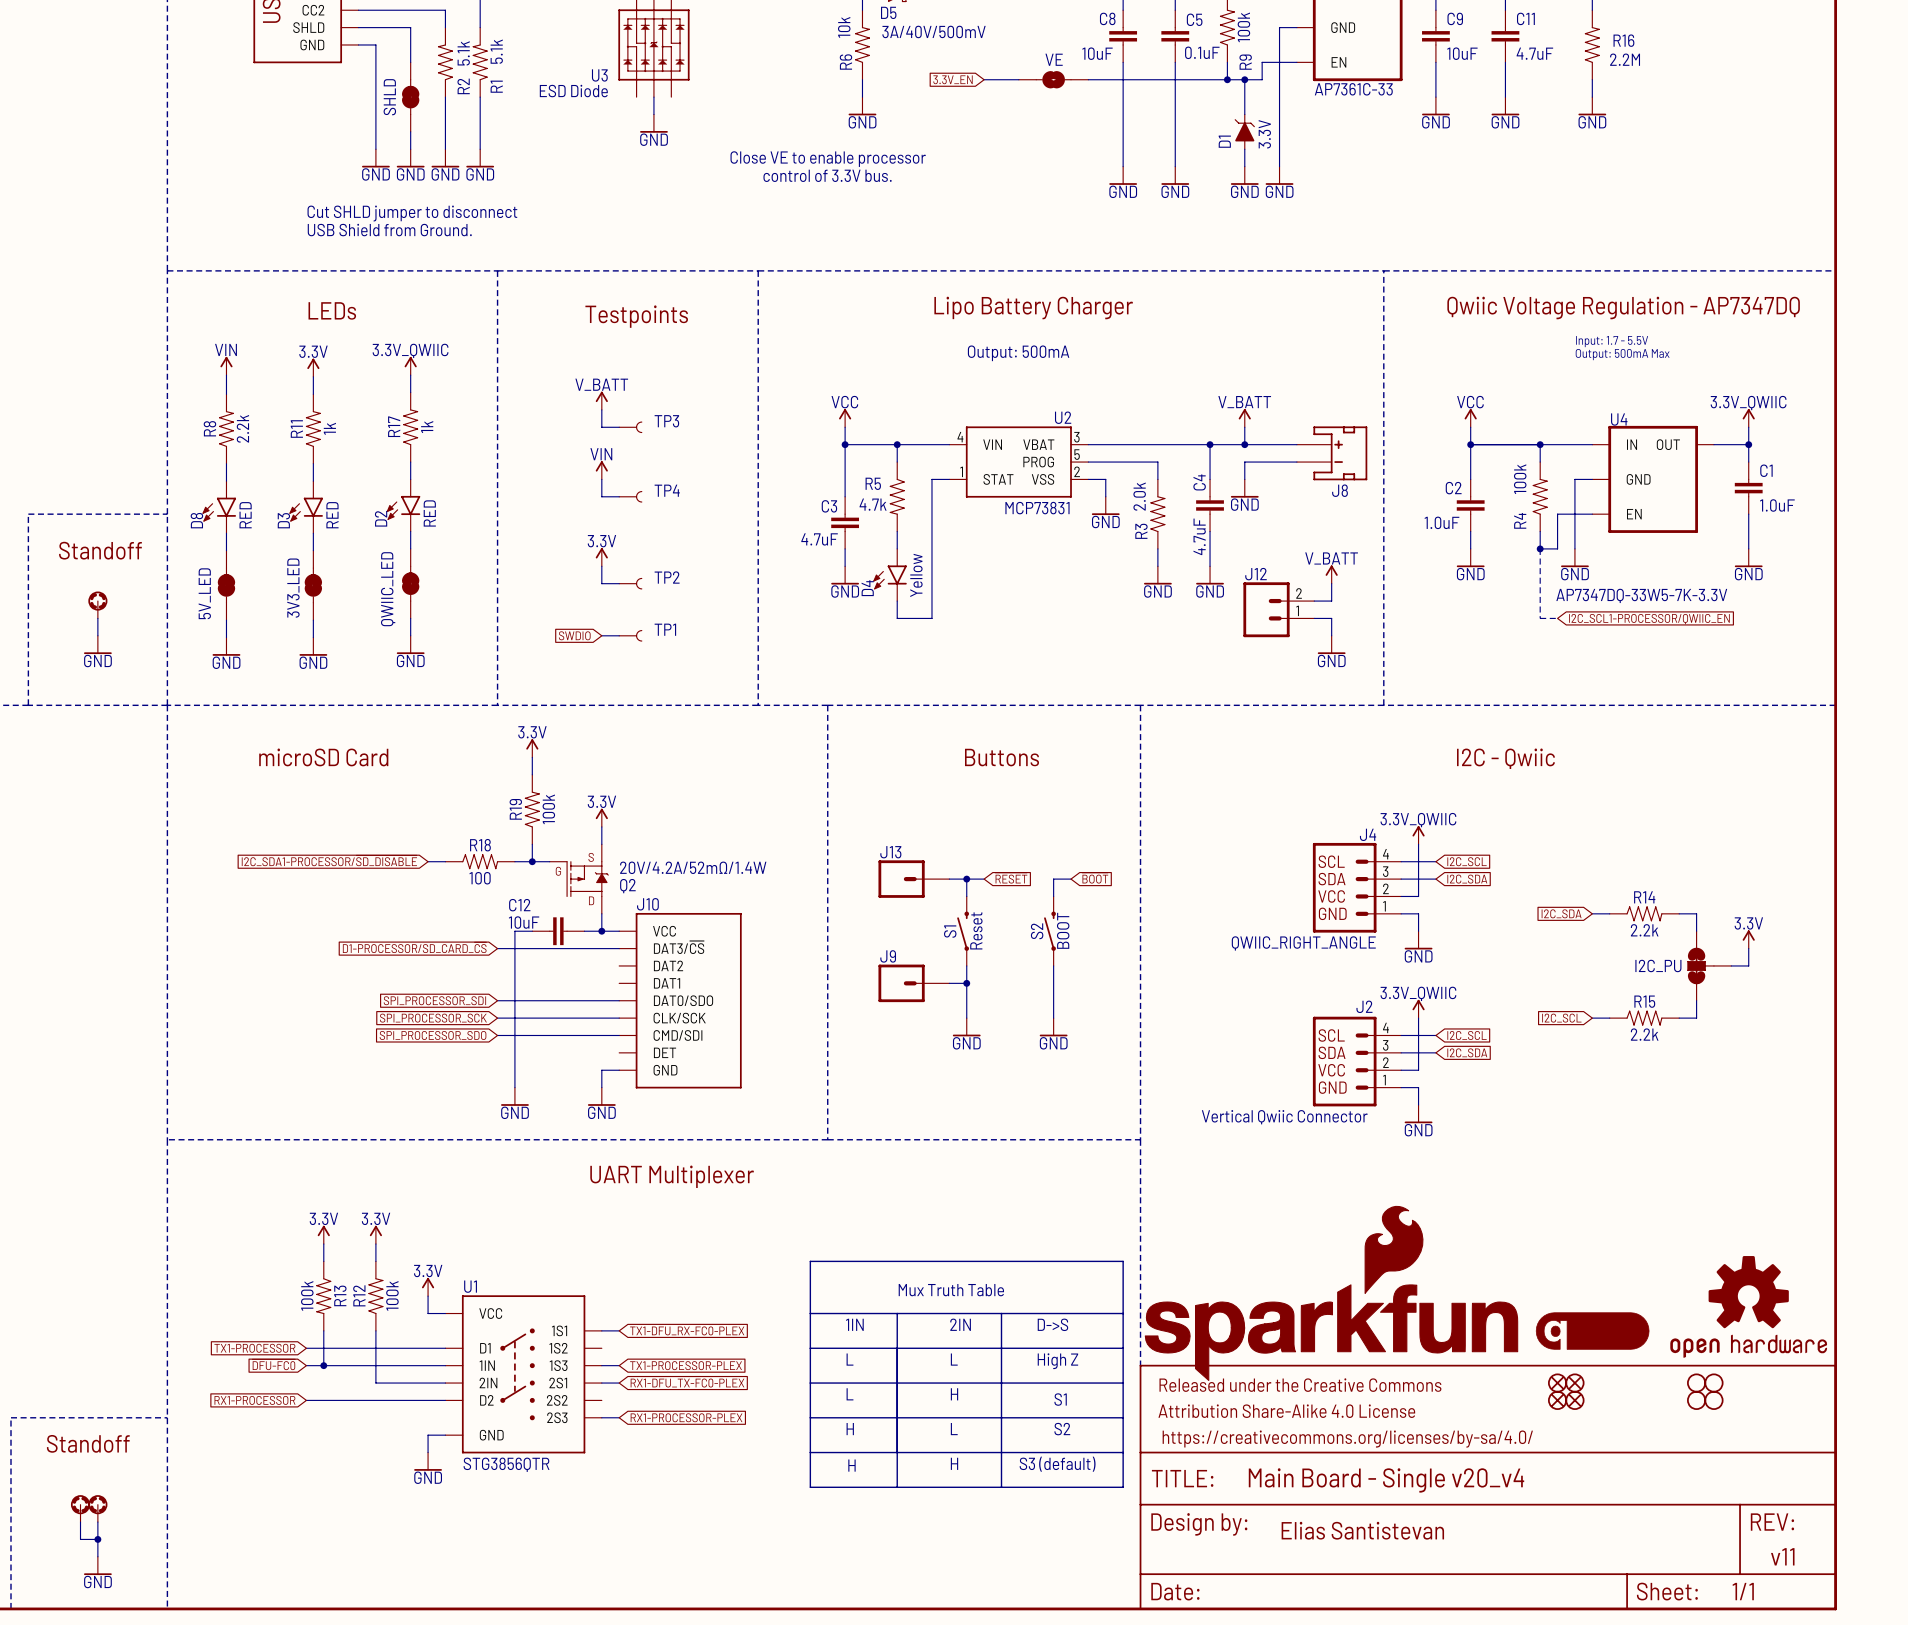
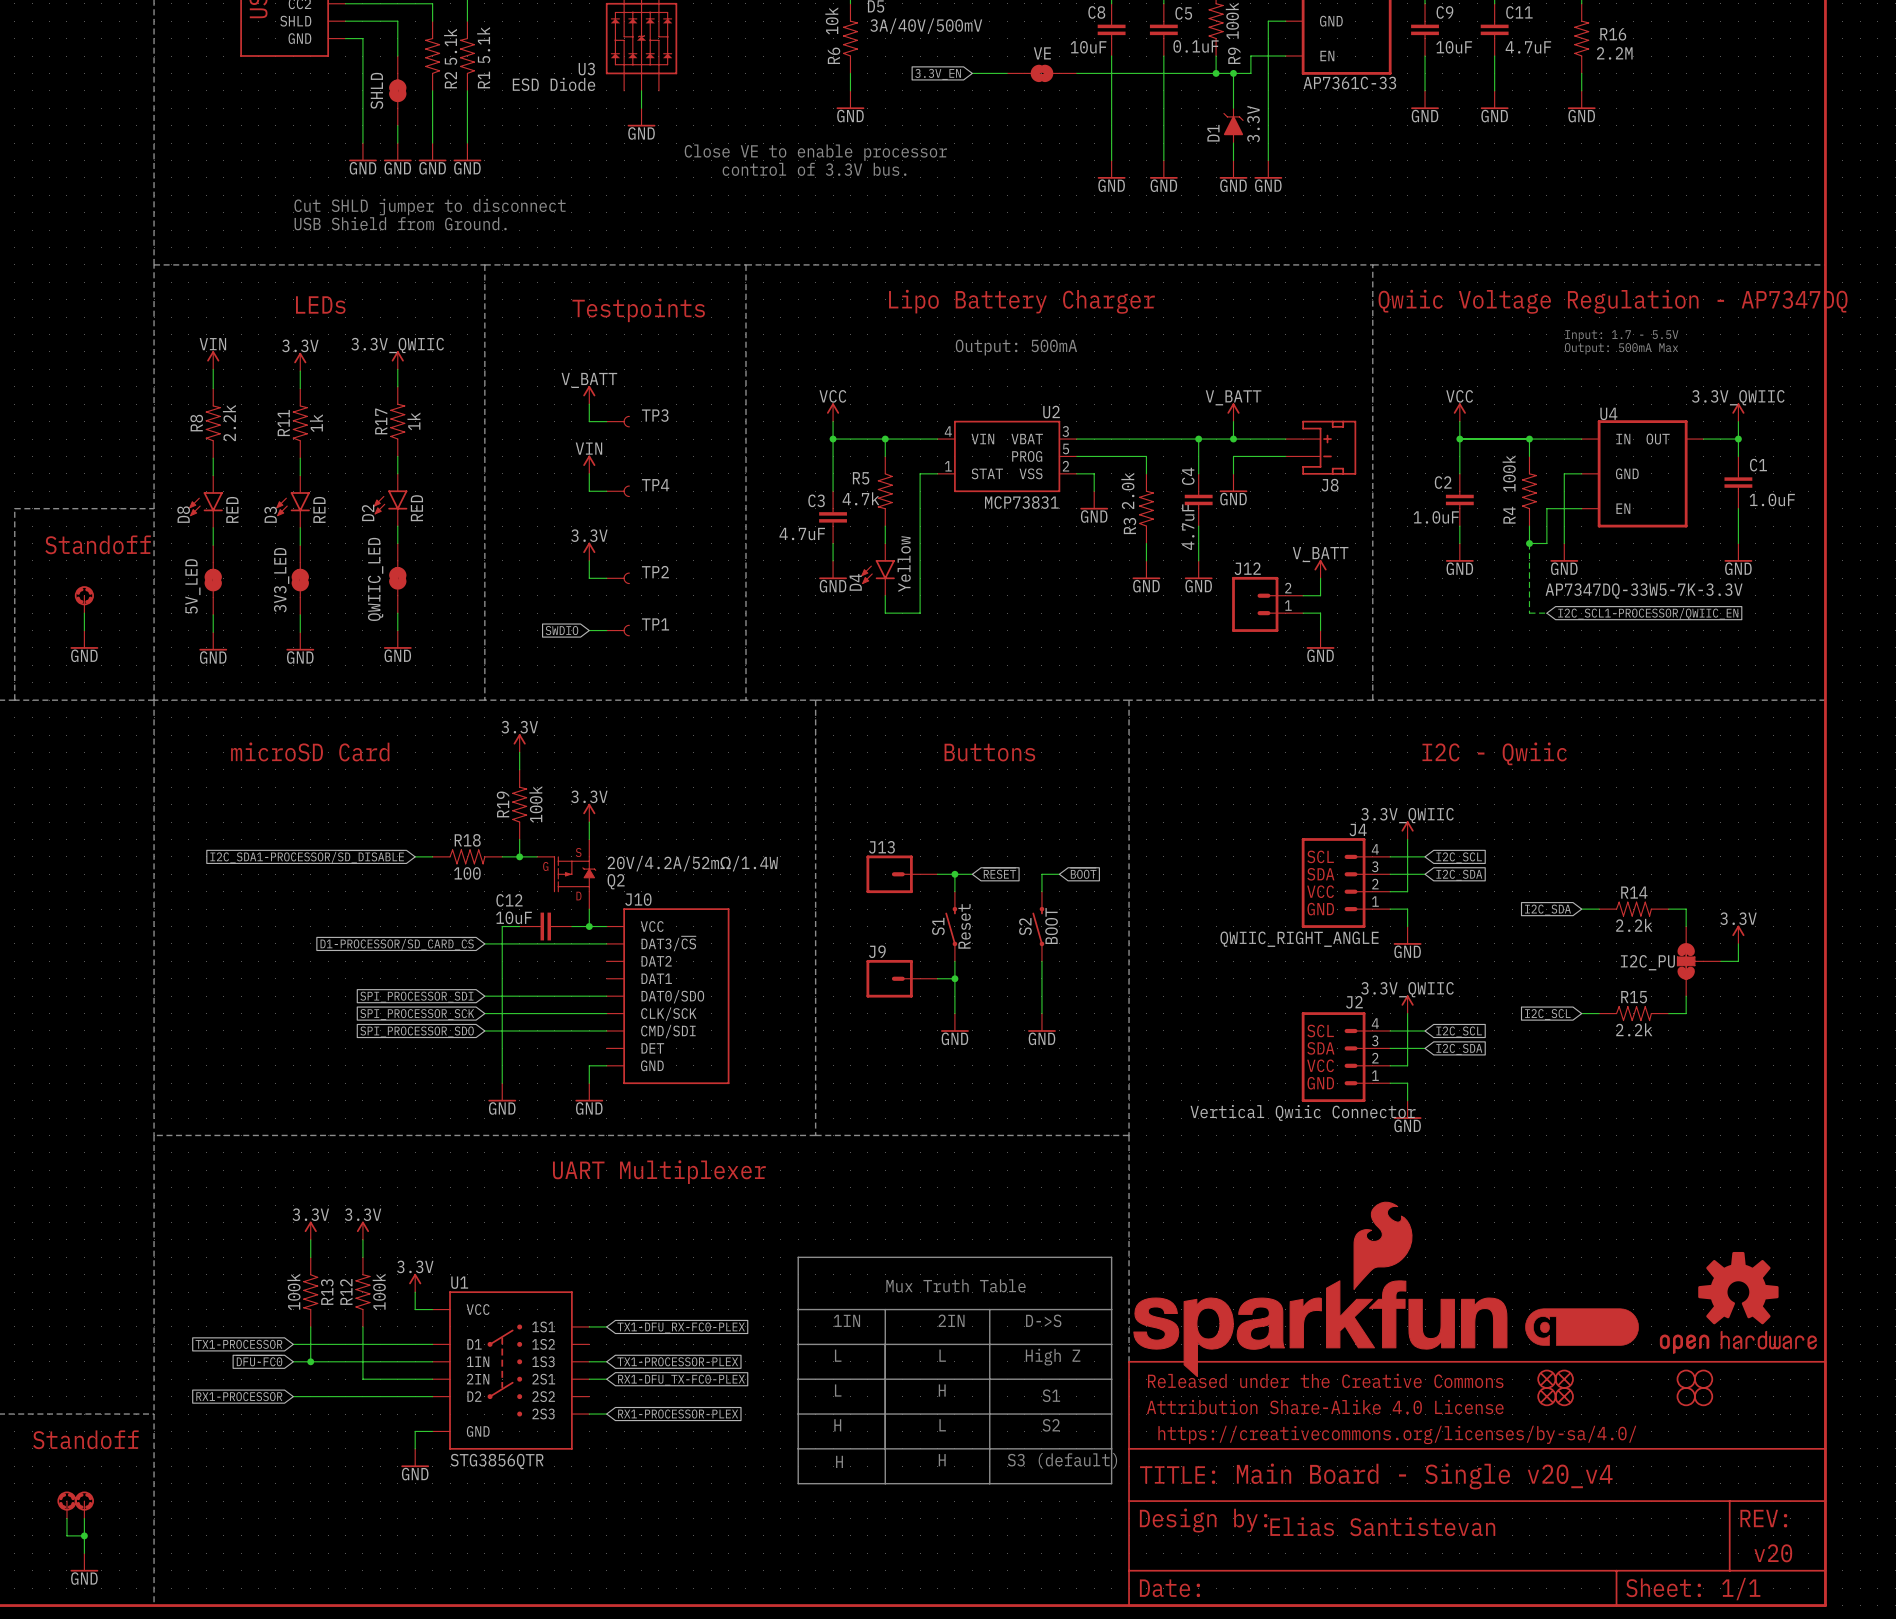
text: v11 (1782, 1556) -> v20 (1773, 1553)

